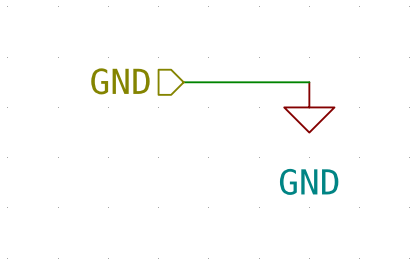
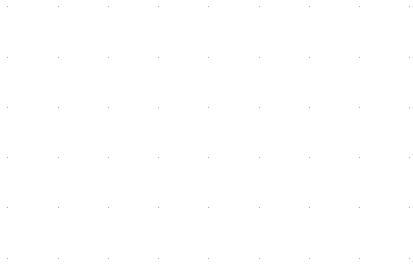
hierarchical label: GND (120, 81) -> none
wire: (183, 82) (309, 82) -> none
power symbol: GND (309, 107) -> none

